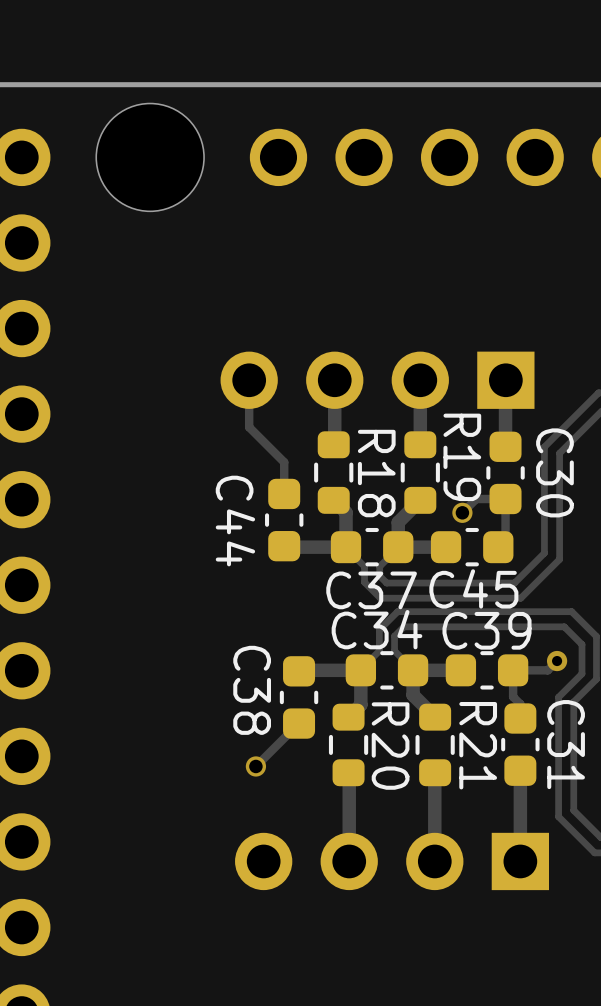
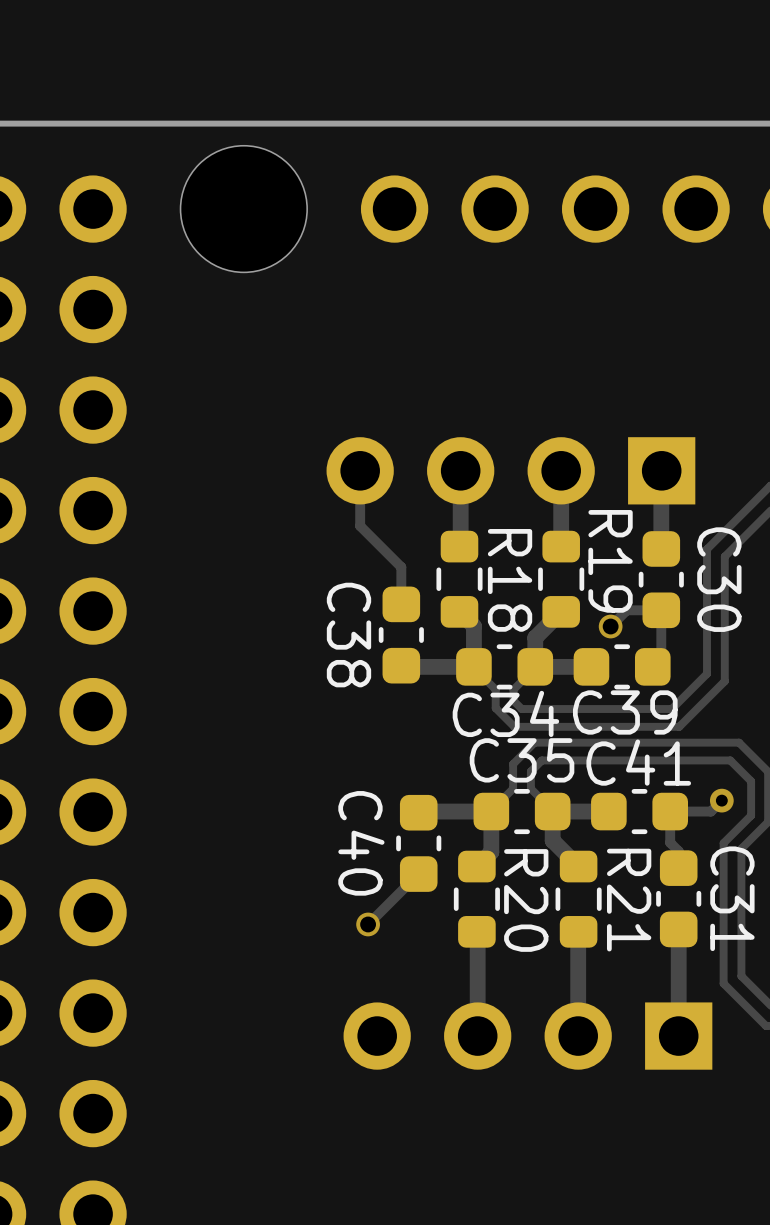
C44 name: C44 (235, 521) -> C38 (348, 635)
C45 name: C45 (473, 588) -> C39 (625, 712)
C37 name: C37 (371, 590) -> C34 (505, 713)
C34 name: C34 (376, 629) -> C35 (522, 760)
C39 name: C39 (487, 630) -> C41 (638, 762)
C38 name: C38 (252, 690) -> C40 (361, 843)

